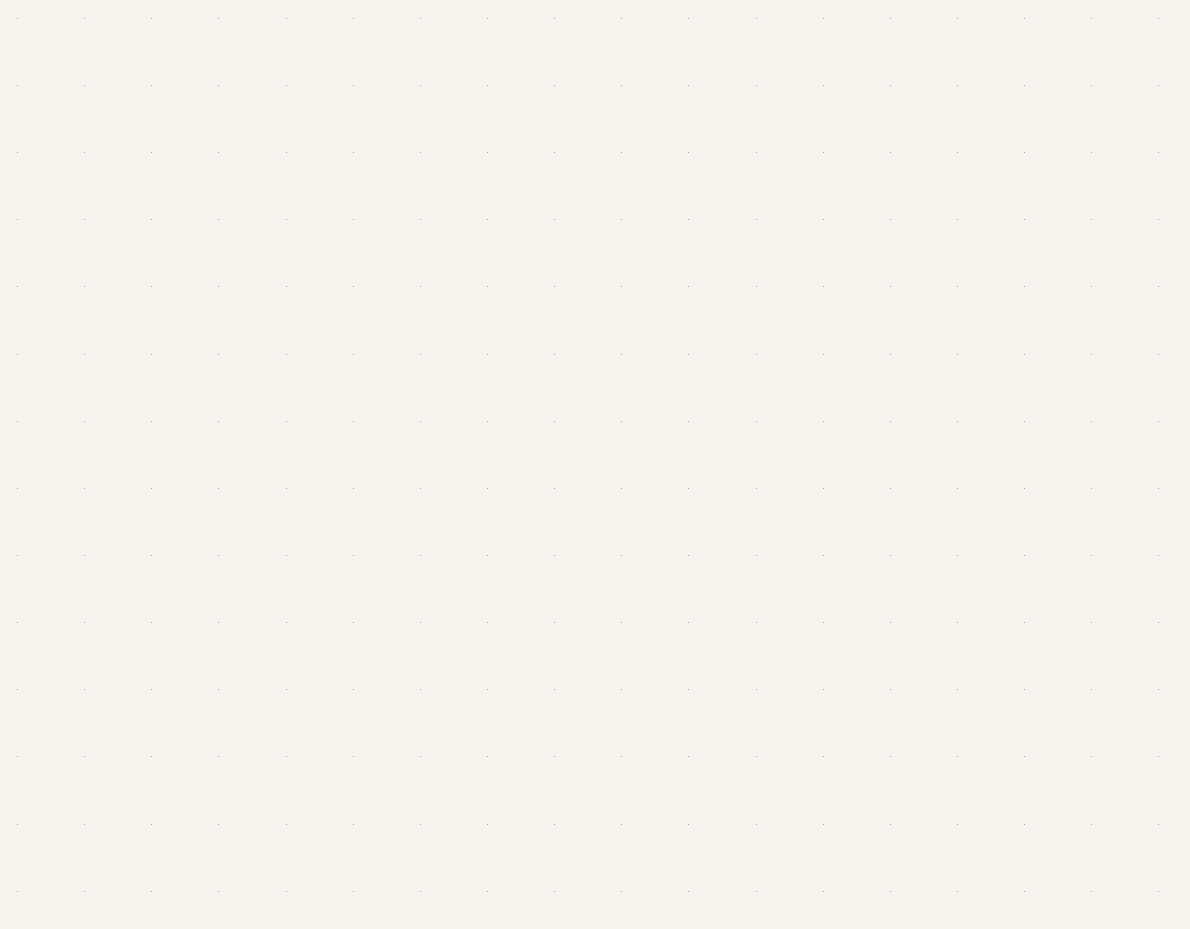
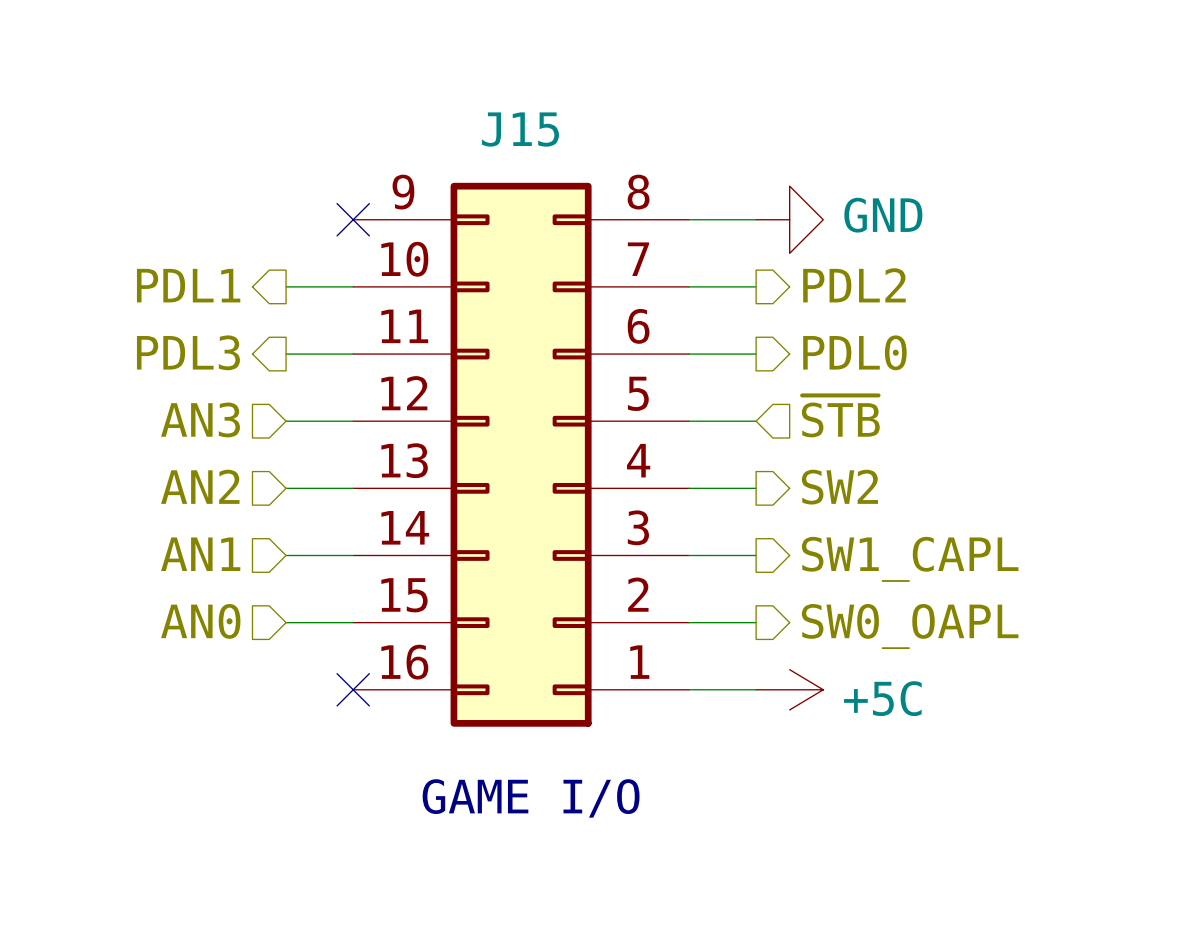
no-connect mark: none -> (353, 219)
wire: none -> (688, 219) (756, 219)
power symbol: none -> GND (789, 219)
hierarchical label: none -> PDL1 (188, 285)
hierarchical label: none -> PDL2 (854, 285)
wire: none -> (286, 286) (353, 286)
wire: none -> (688, 286) (756, 286)
hierarchical label: none -> PDL3 (188, 352)
hierarchical label: none -> PDL0 (854, 352)
wire: none -> (286, 354) (353, 354)
wire: none -> (688, 354) (756, 354)
hierarchical label: none -> ~{STB} (840, 416)
hierarchical label: none -> AN3 (200, 419)
wire: none -> (286, 421) (353, 421)
wire: none -> (688, 421) (756, 421)
J15: none -> (521, 454)
hierarchical label: none -> AN2 (200, 486)
hierarchical label: none -> SW2 (839, 487)
wire: none -> (286, 488) (353, 488)
wire: none -> (688, 488) (756, 488)
hierarchical label: none -> AN1 (200, 554)
wire: none -> (286, 555) (353, 555)
wire: none -> (688, 555) (756, 555)
hierarchical label: none -> SW1_CAPL (910, 559)
hierarchical label: none -> AN0 (200, 621)
wire: none -> (286, 622) (353, 622)
wire: none -> (688, 622) (756, 622)
hierarchical label: none -> SW0_OAPL (910, 626)
no-connect mark: none -> (353, 689)
wire: none -> (688, 689) (756, 689)
power symbol: none -> +5C (789, 689)
text: none -> GAME I/O (531, 798)

